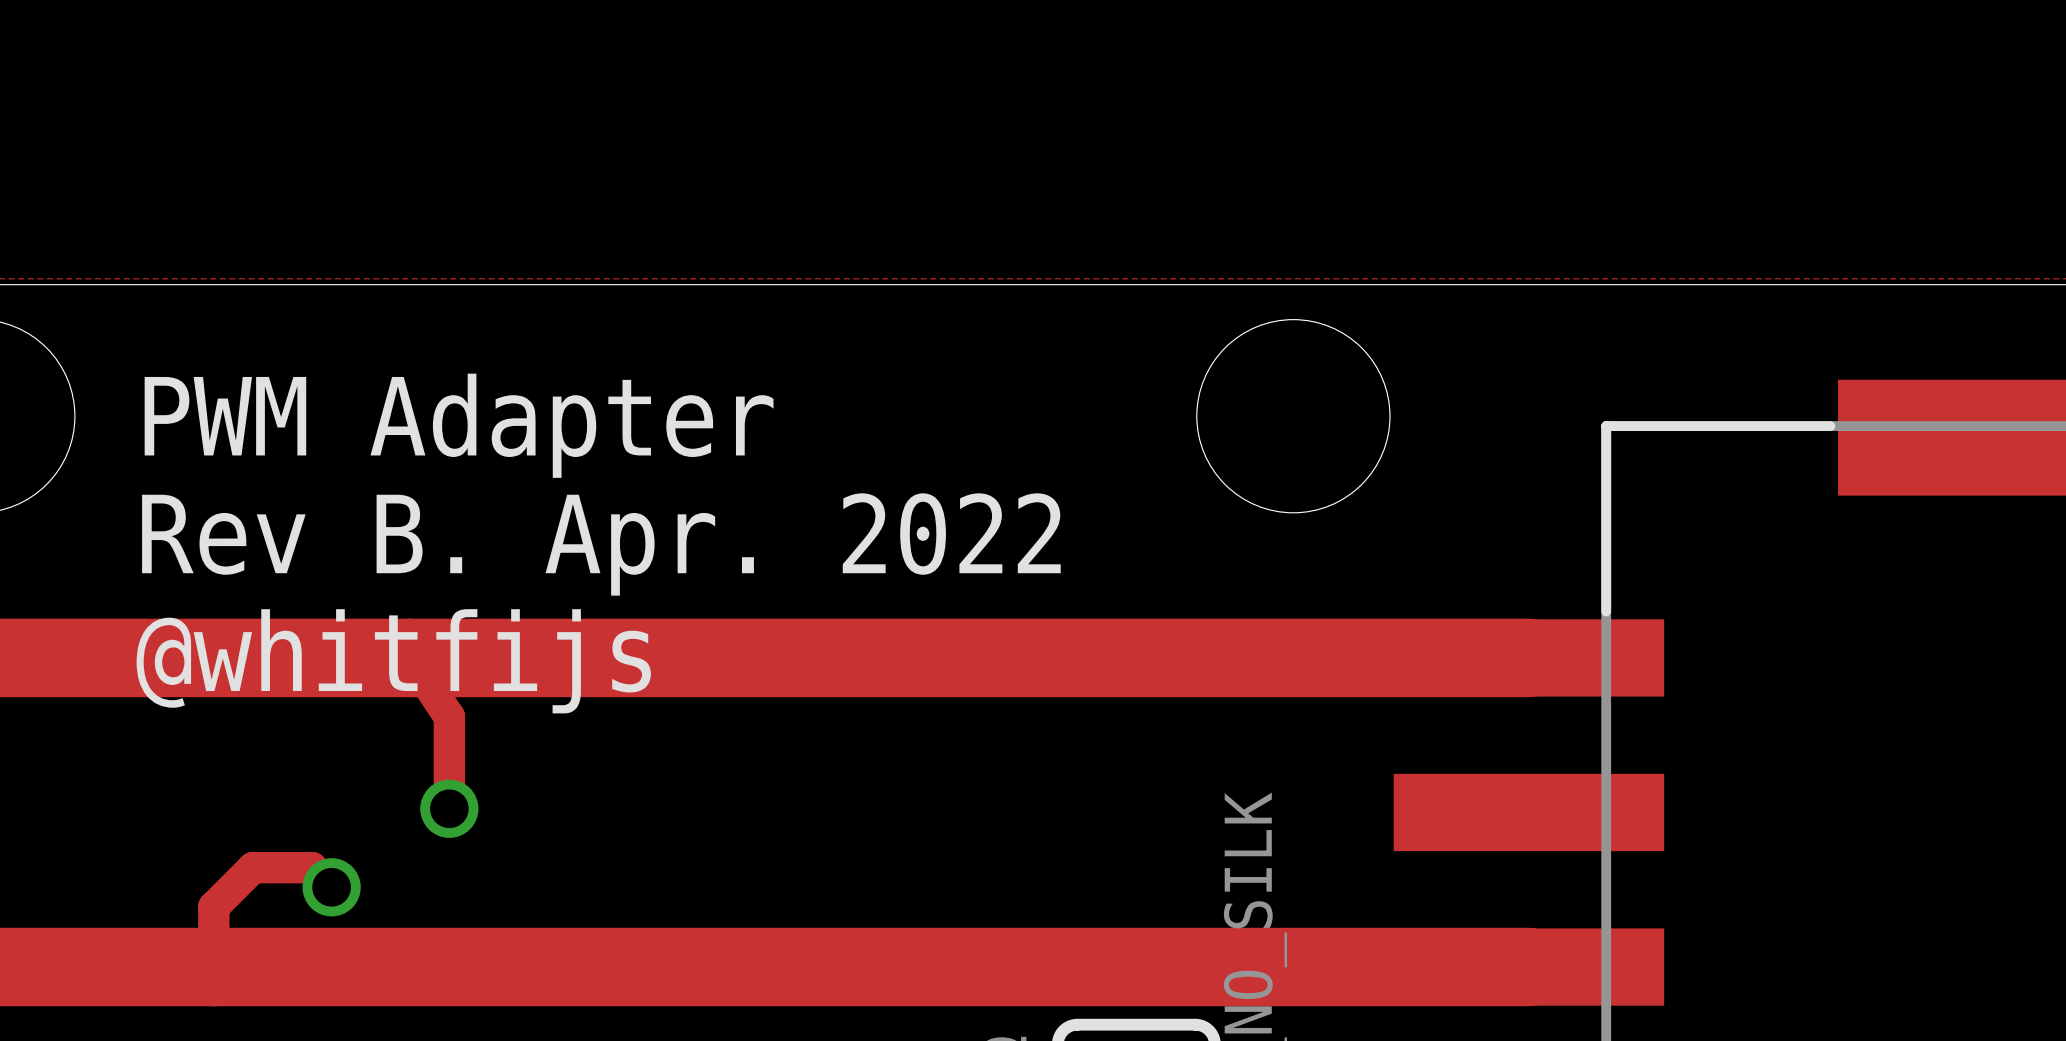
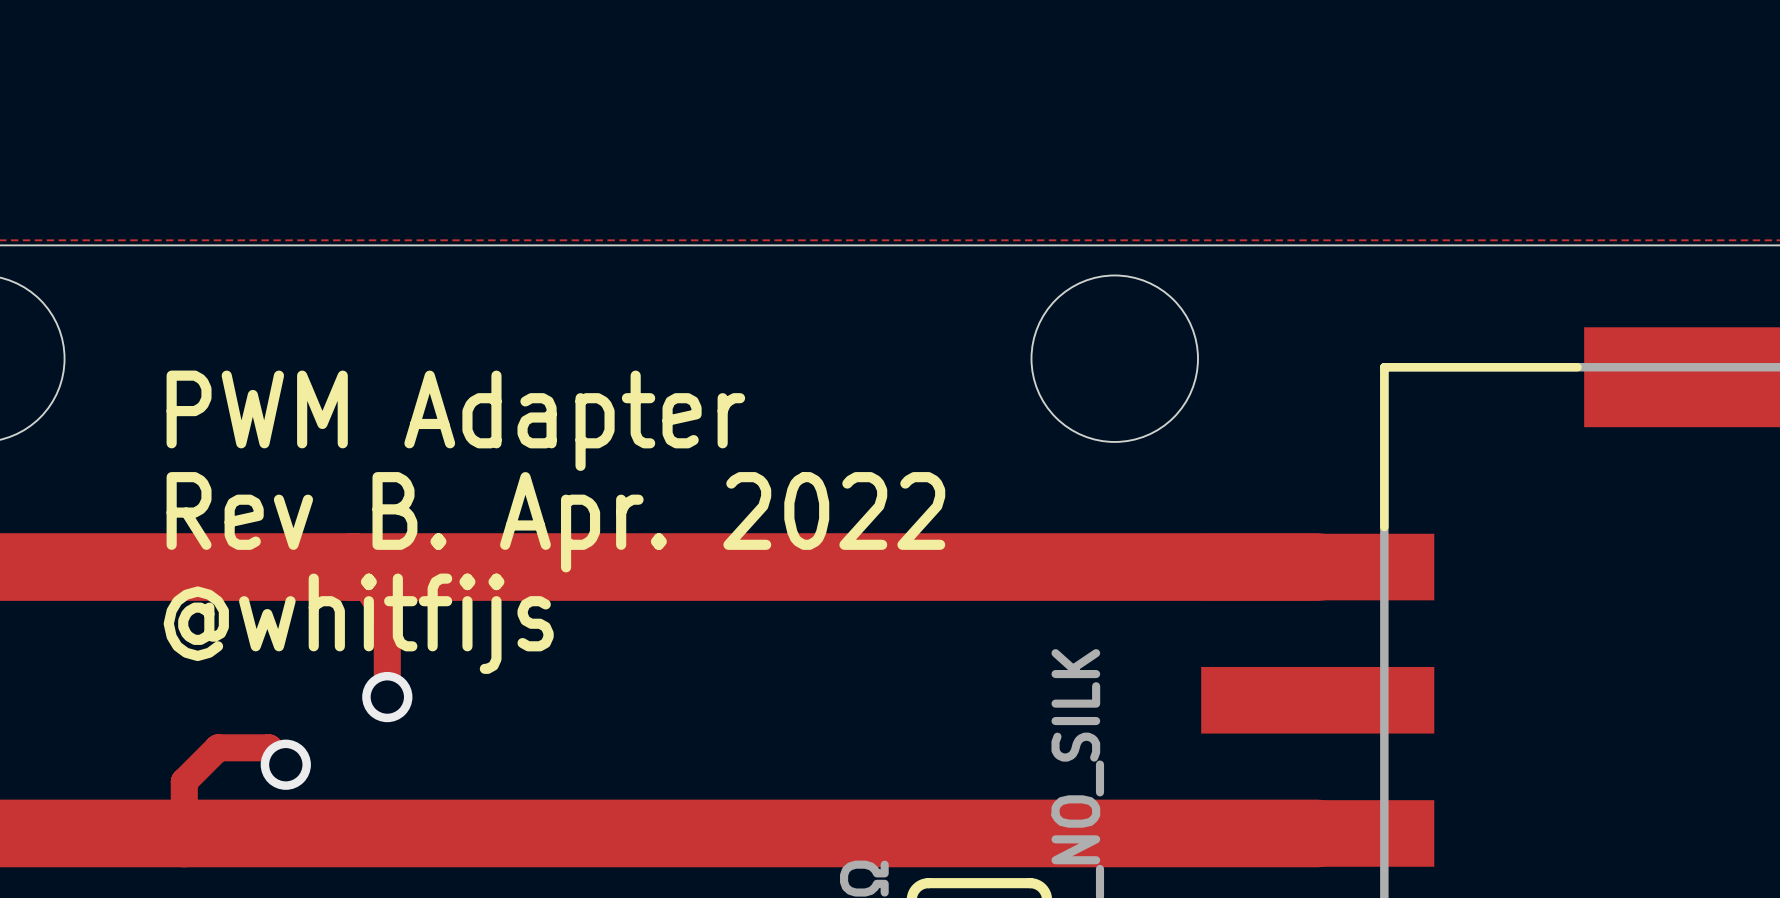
text position: PWM Adapter (459, 425) -> PWM Adapter (455, 420)
text position: Rev B. Apr. 2022 (601, 544) -> Rev B. Apr. 2022 (555, 522)
text position: @whitfijs (393, 661) -> @whitfijs (358, 623)

